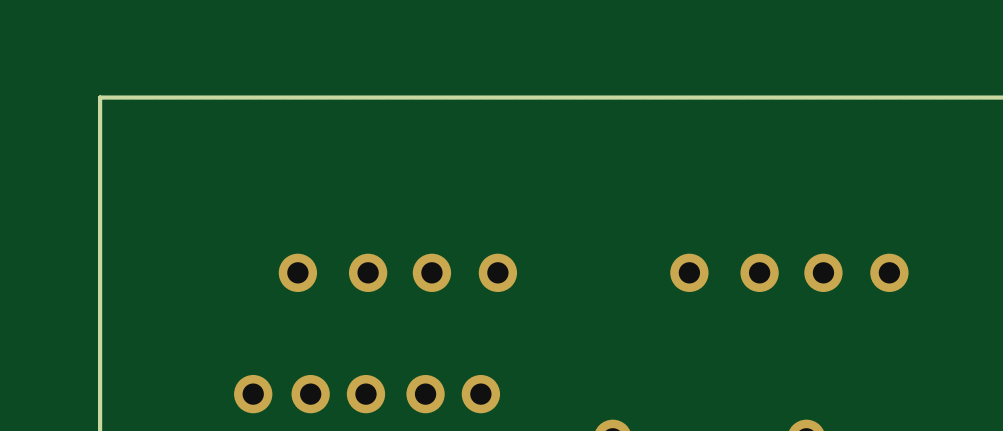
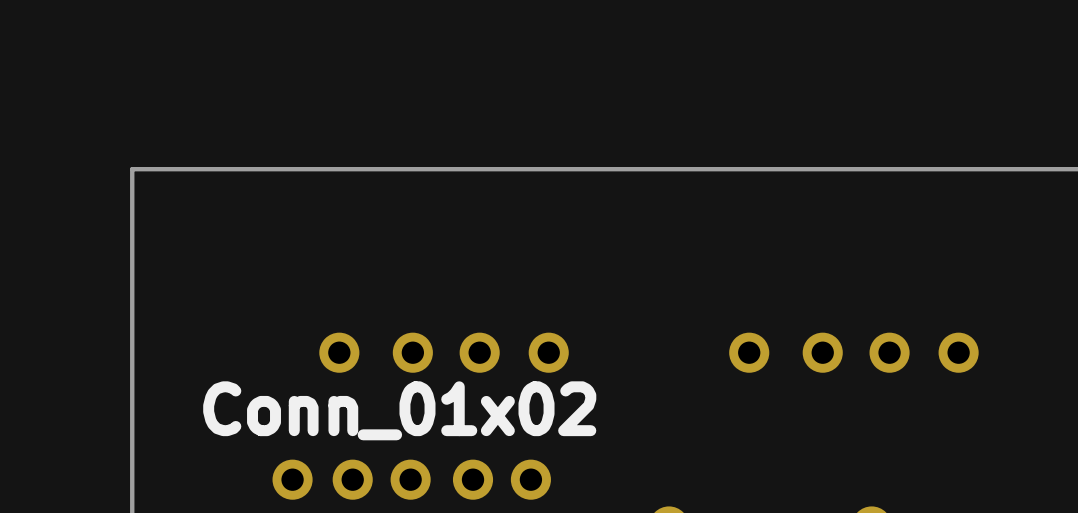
part value: none -> Conn_01x02 (399, 410)

